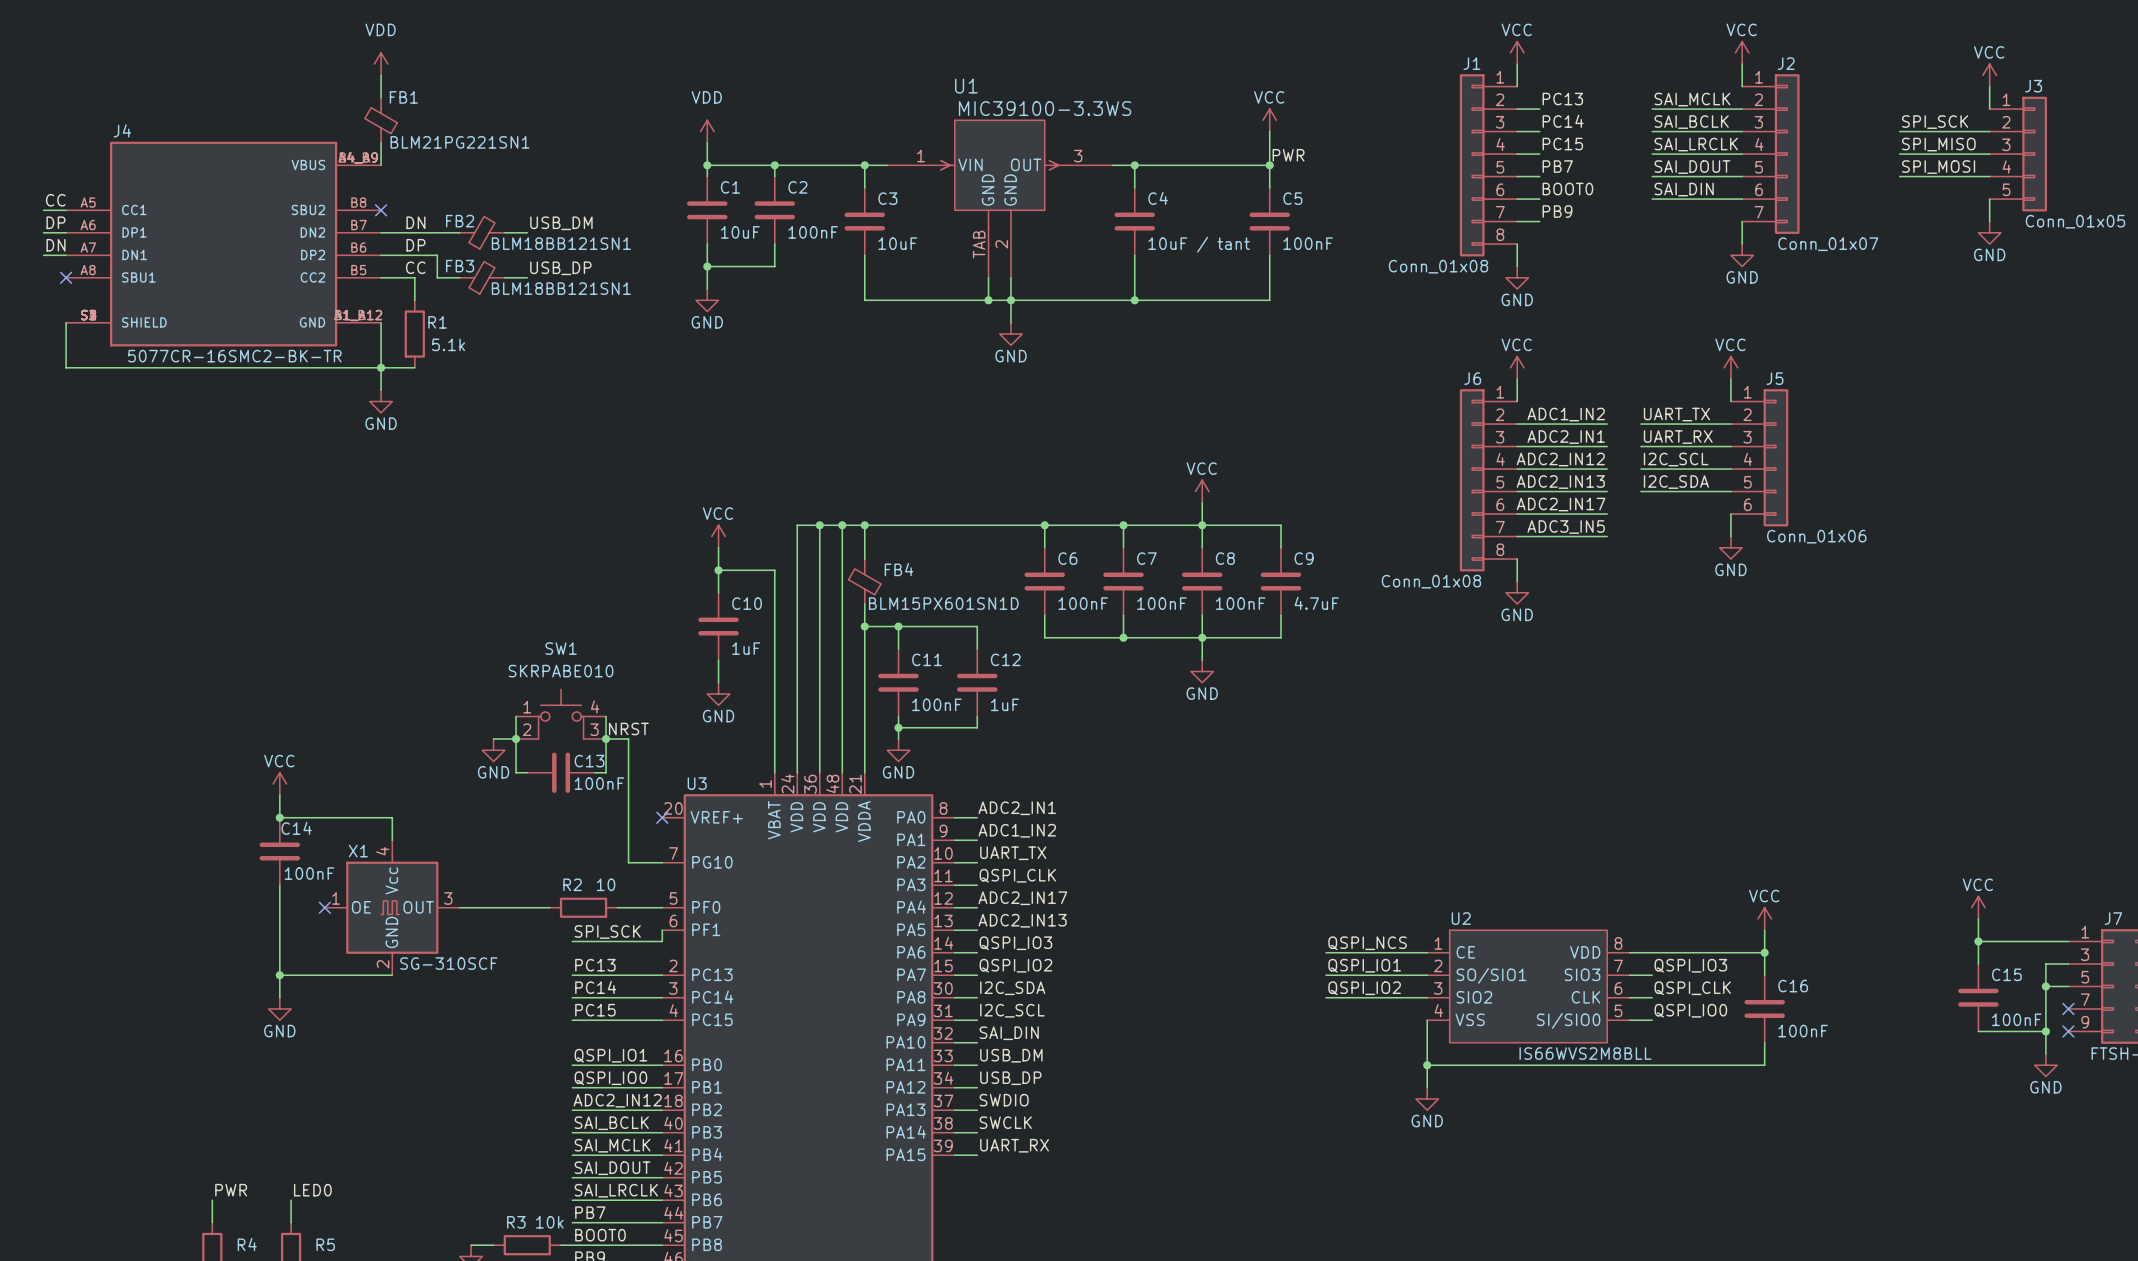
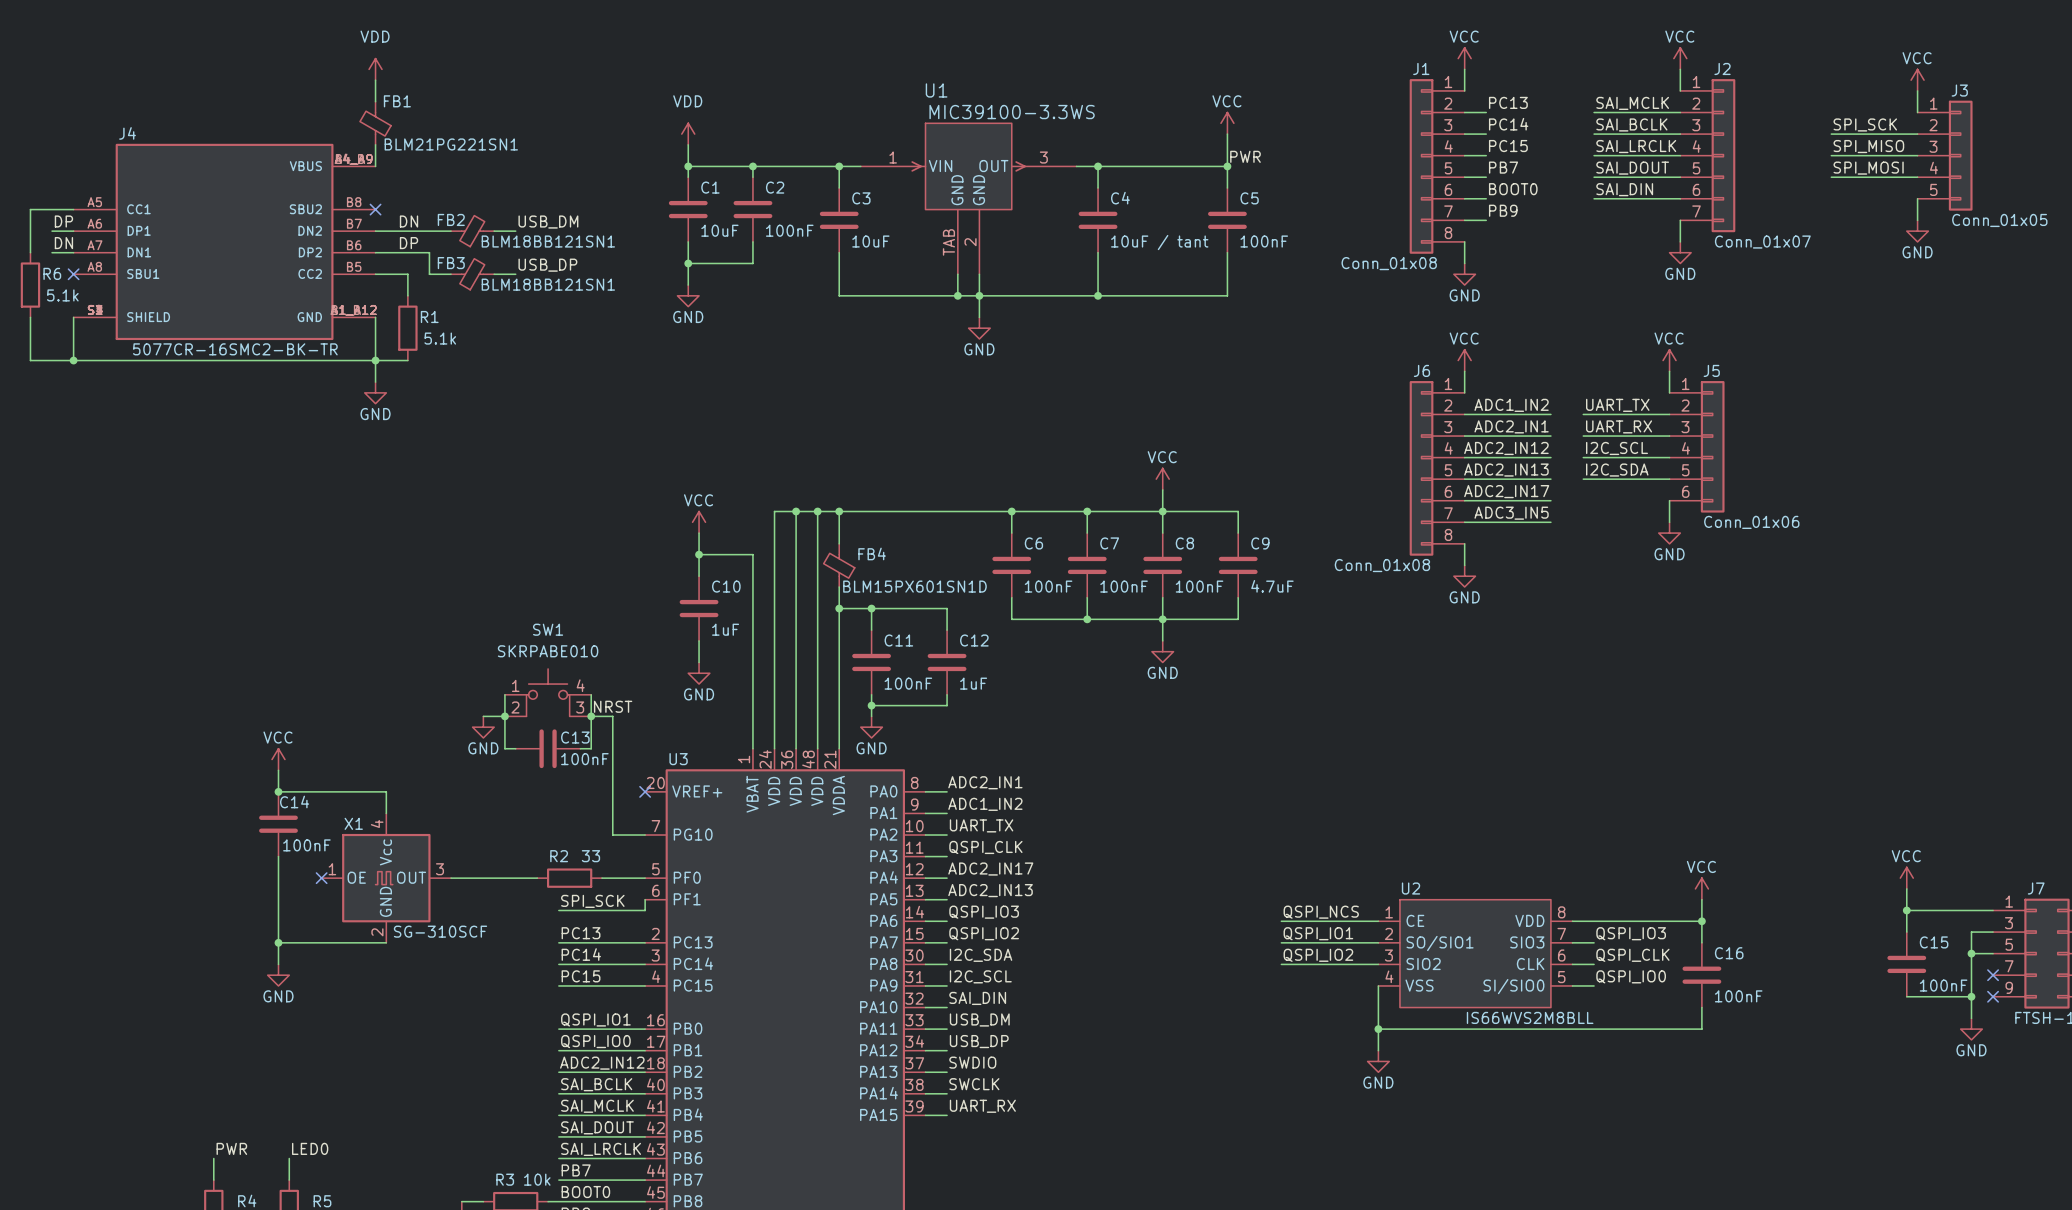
label: CC (55, 200) -> none
wire: none -> (52, 209) (30, 209) (30, 252)
label: CC (415, 267) -> none
R6: none -> 5.1k (30, 285)
wire: none -> (30, 317) (30, 360) (73, 360)
junction: none -> (73, 360)
R2 value: 10 (606, 884) -> 33 (590, 856)

